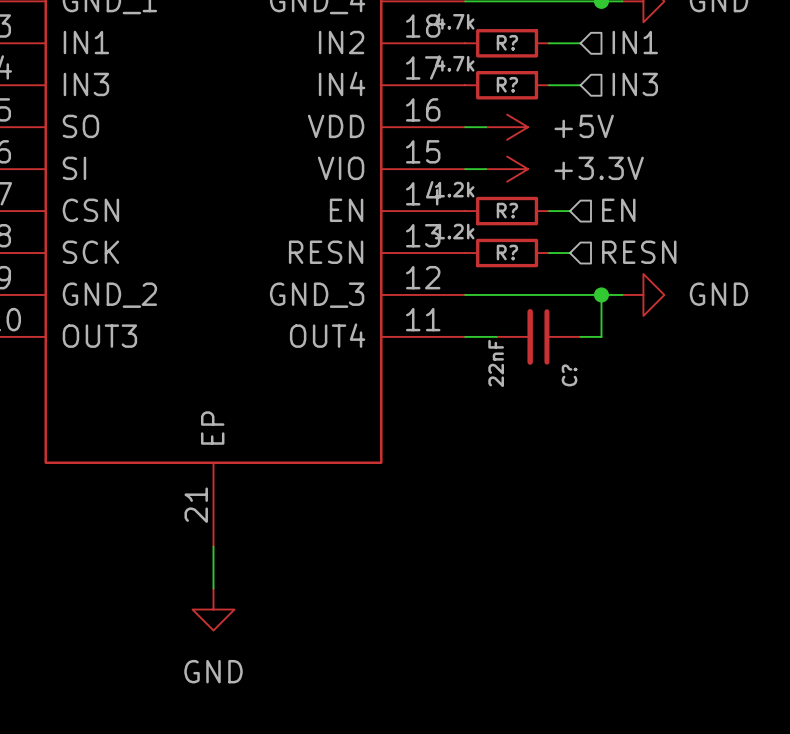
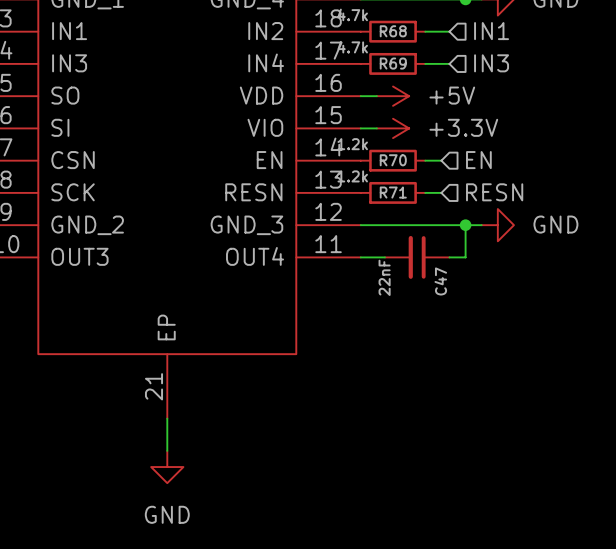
R? name: R? (507, 42) -> R68 (393, 31)
R? name: R? (507, 84) -> R69 (393, 63)
R? name: R? (507, 210) -> R70 (393, 160)
R? name: R? (507, 252) -> R71 (393, 192)
C? name: C? (569, 375) -> C47 (440, 281)

